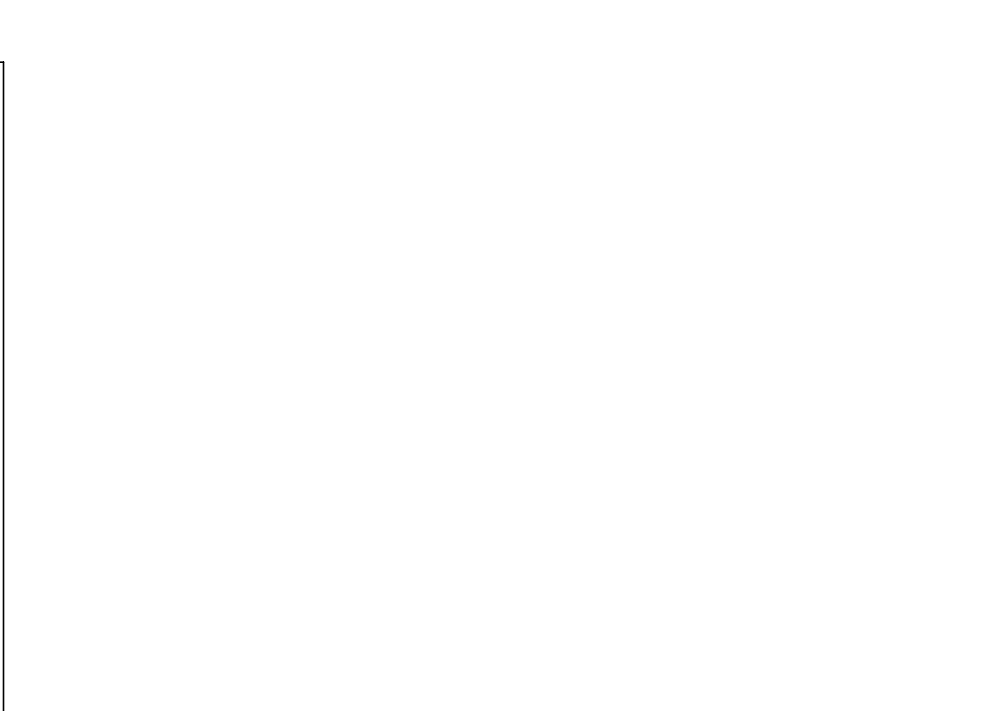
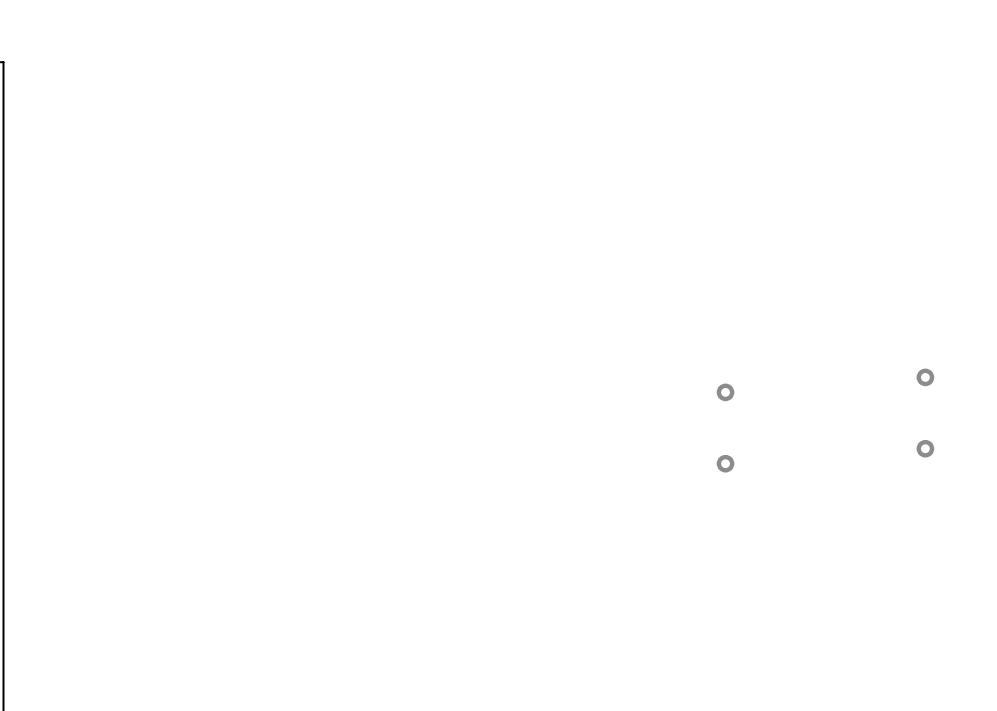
part: none -> (925, 377)
part: none -> (725, 392)
part: none -> (925, 448)
part: none -> (725, 463)

